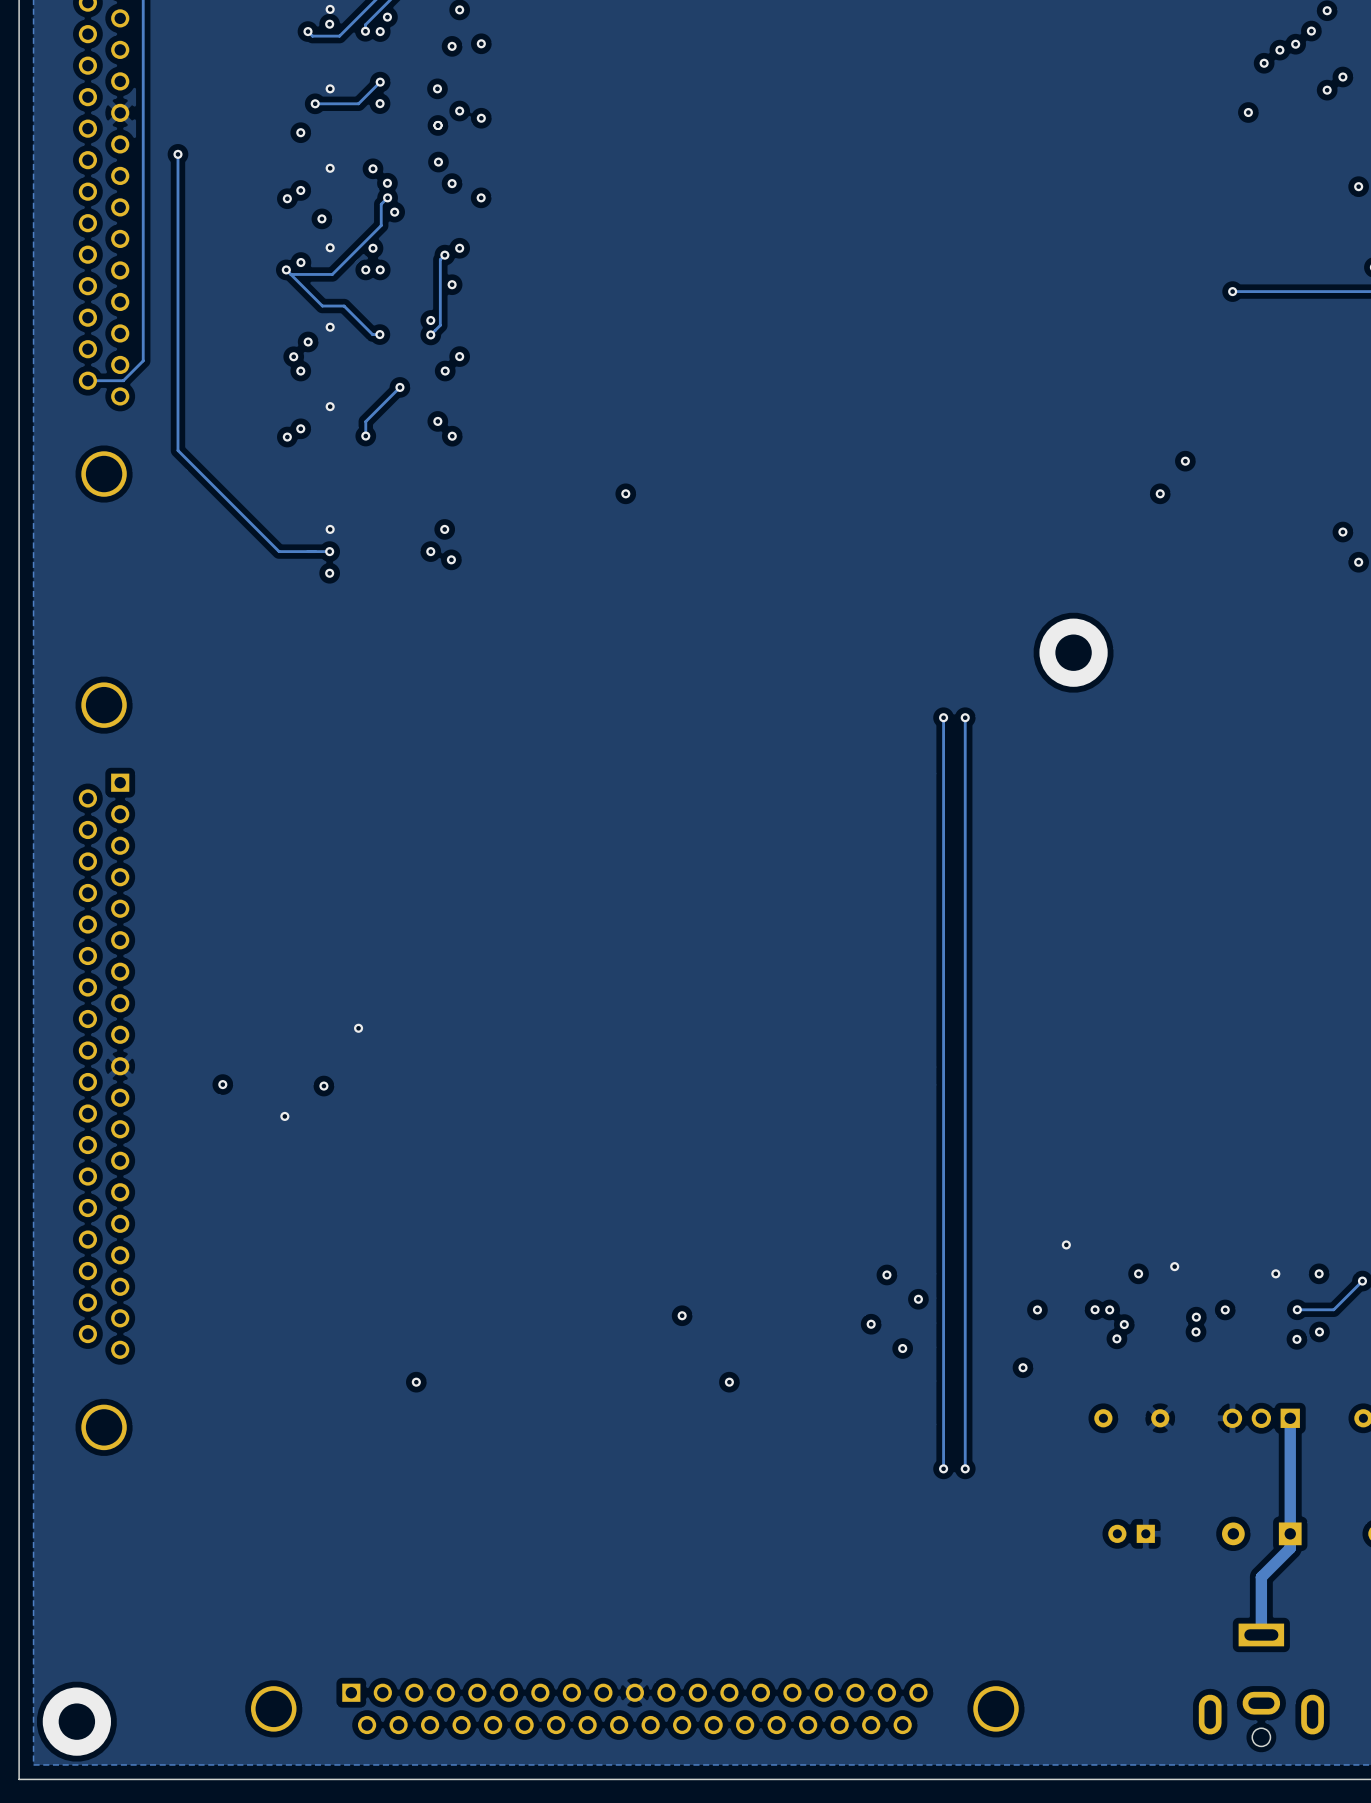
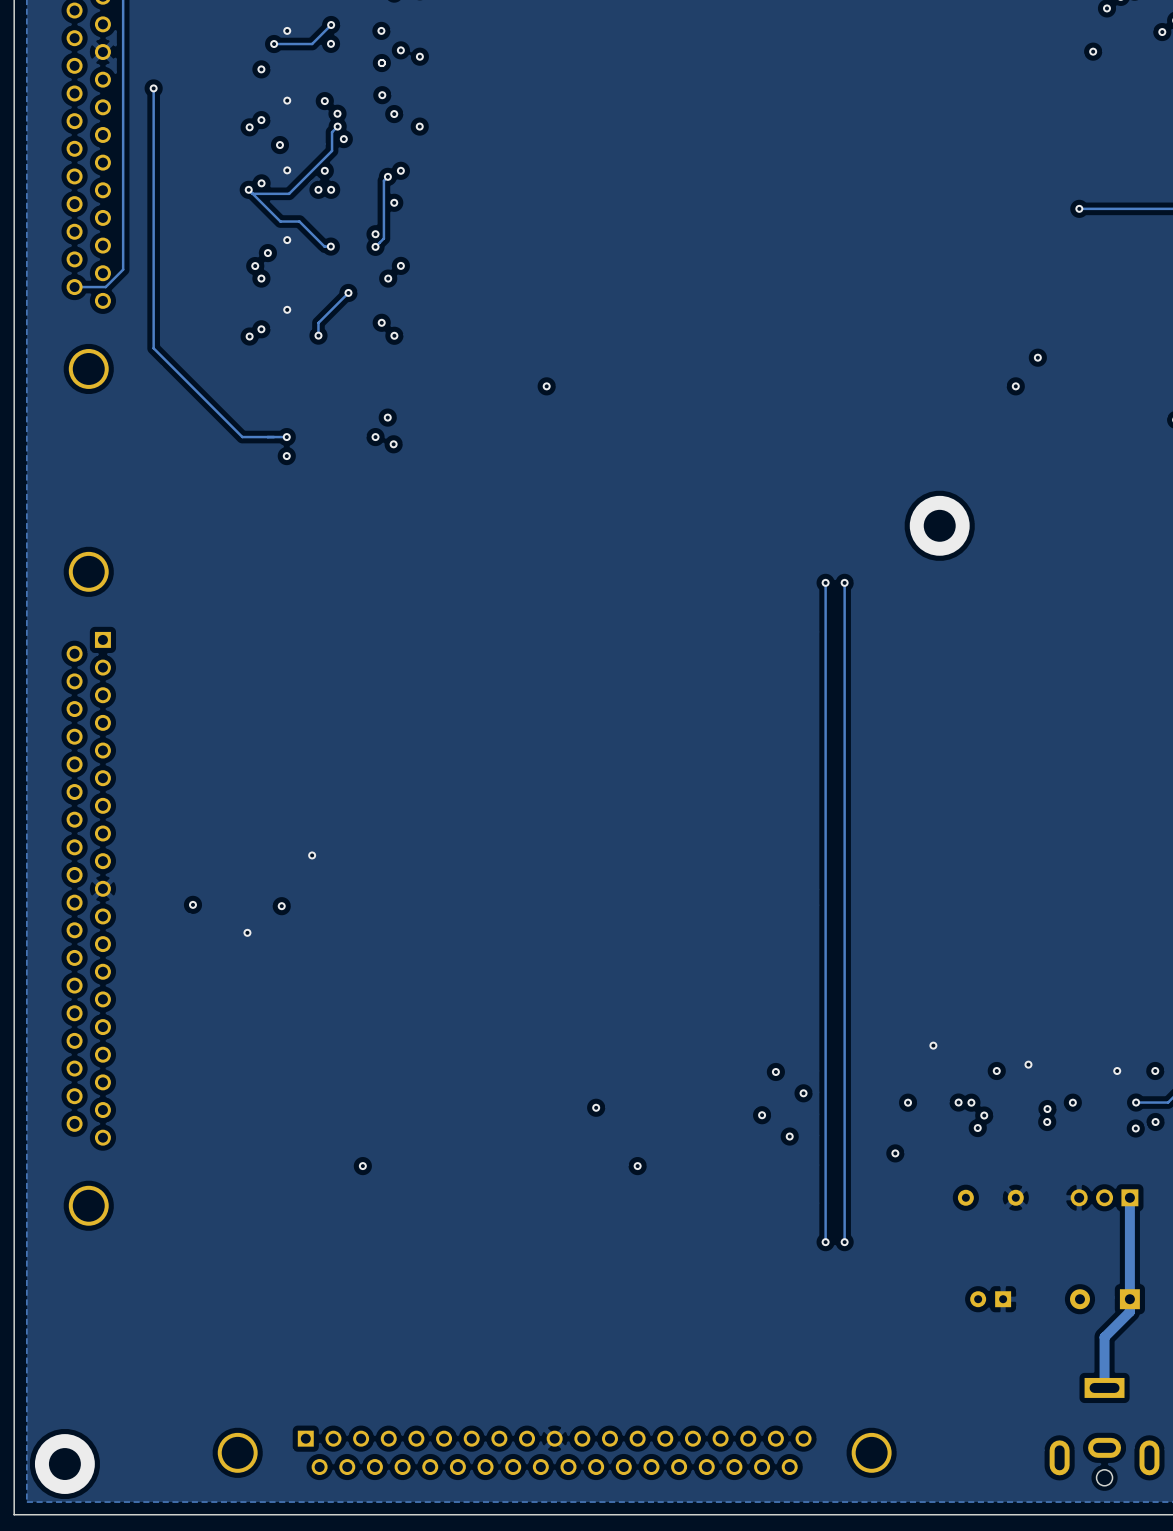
via: (330, 529) -> none

